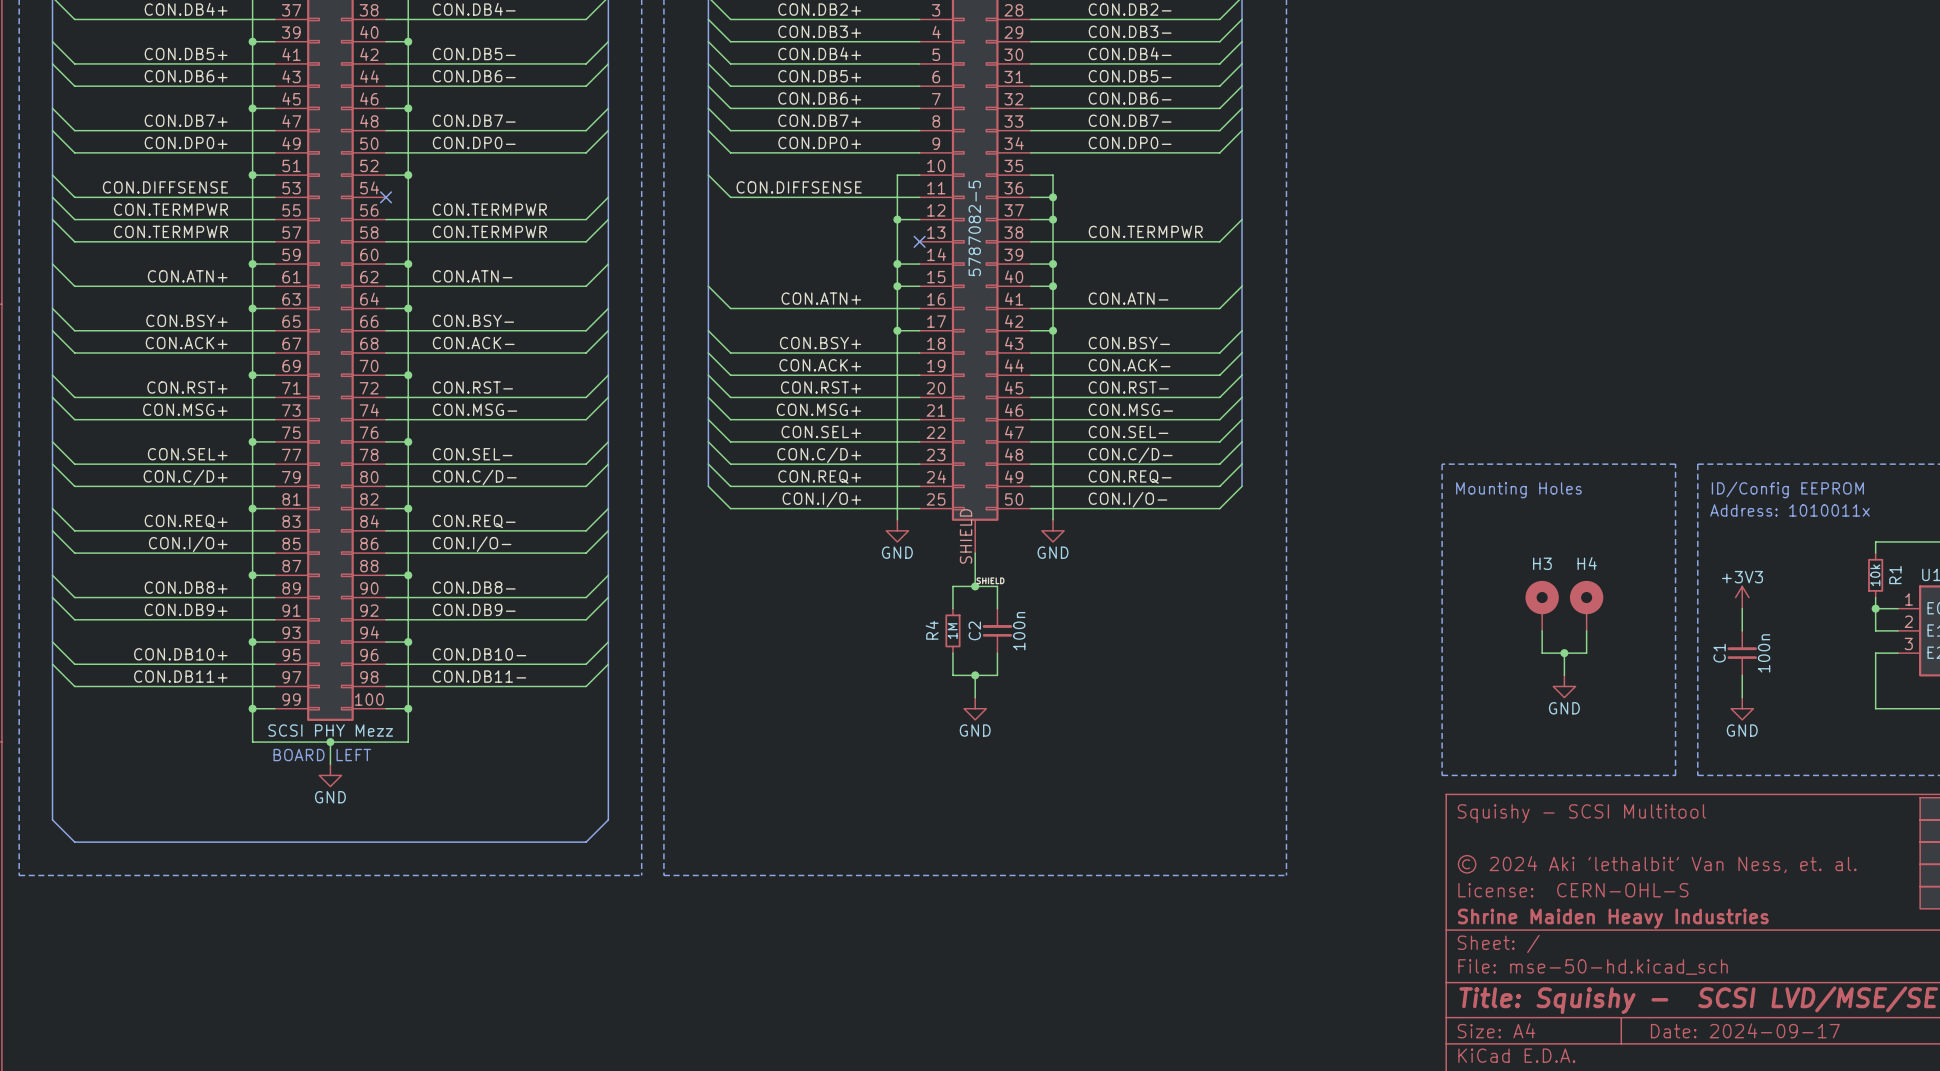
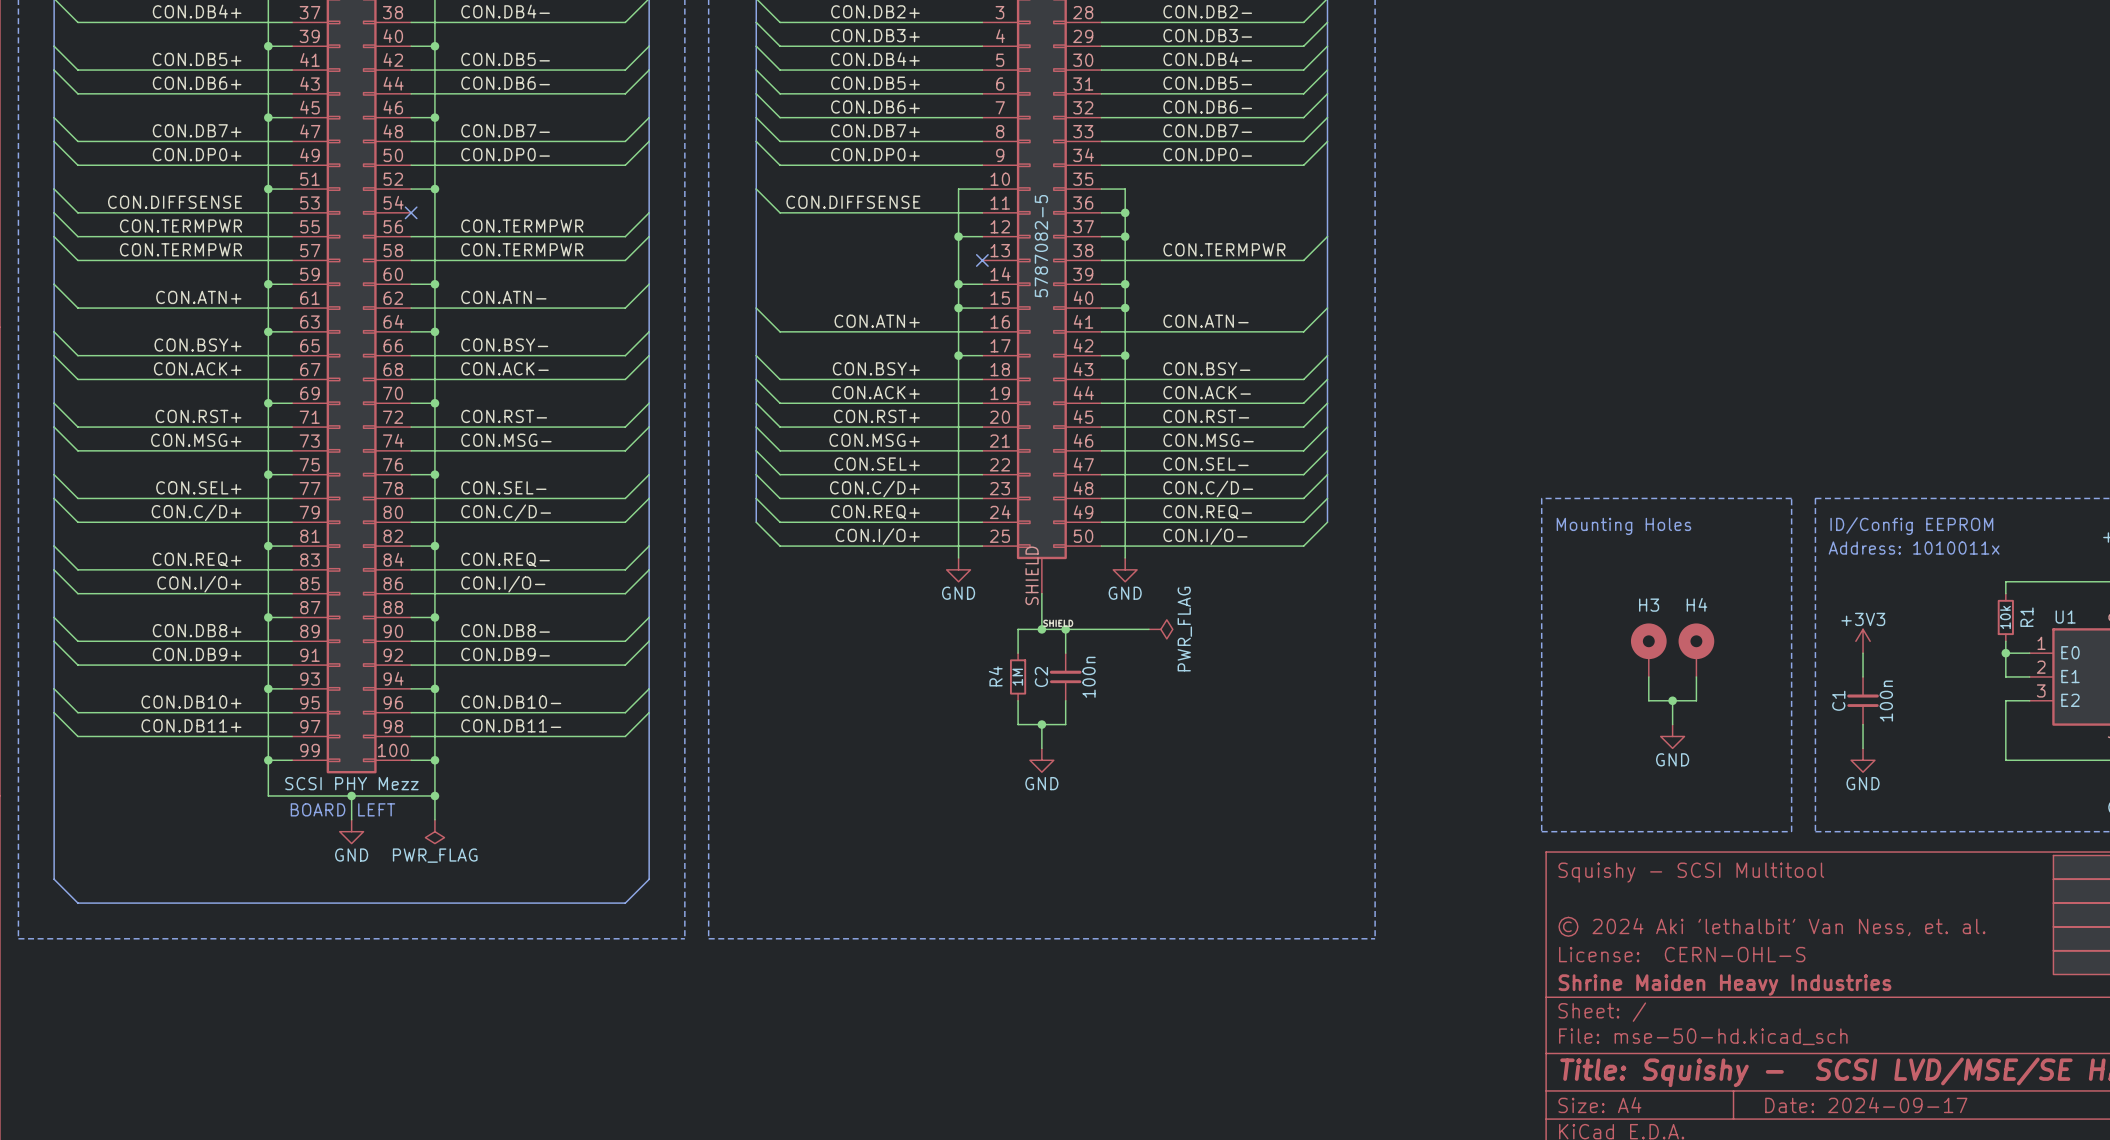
wire: none -> (1065, 629) (1148, 629)
junction: none -> (1065, 629)
power symbol: none -> PWR_FLAG (1160, 629)
wire: none -> (434, 795) (434, 819)
junction: none -> (434, 795)
power symbol: none -> PWR_FLAG (434, 831)

